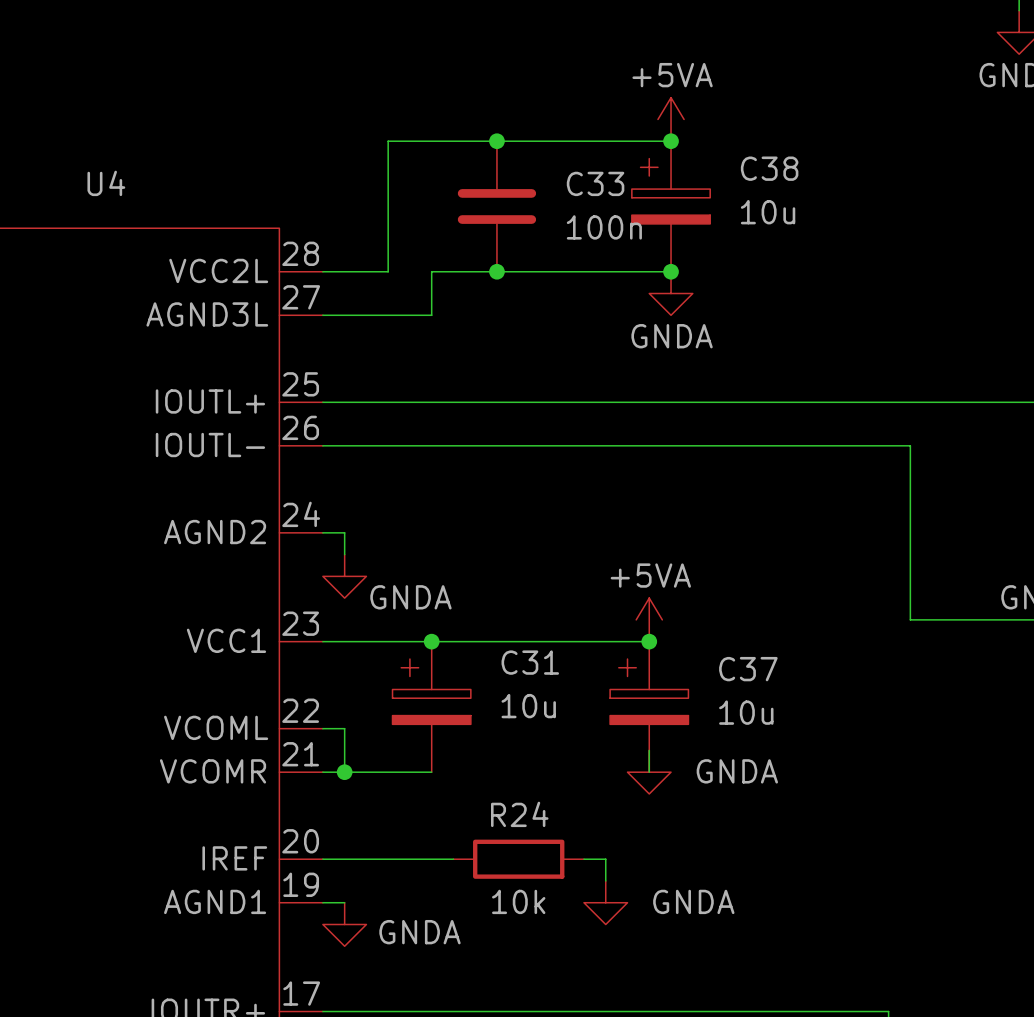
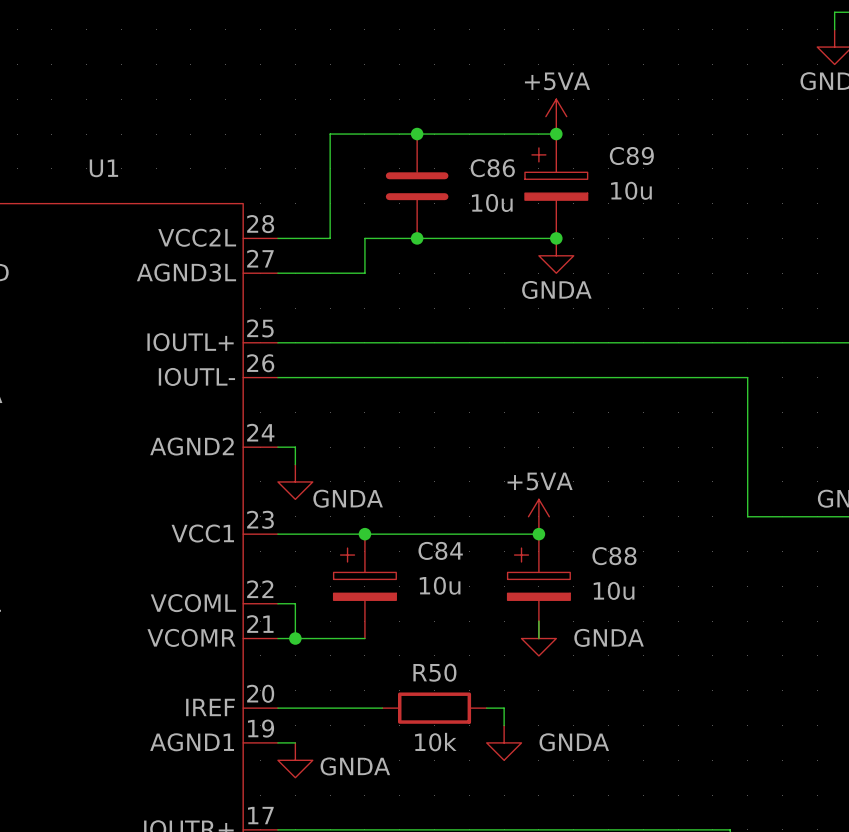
C38 name: C38 (769, 168) -> C89 (631, 156)
U4 name: U4 (106, 183) -> U1 (103, 168)
C33 name: C33 (595, 183) -> C86 (492, 168)
C33 value: 100n (604, 227) -> 10u (492, 202)
C31 name: C31 (530, 662) -> C84 (440, 550)
C37 name: C37 (748, 669) -> C88 (614, 556)
R24 name: R24 (519, 814) -> R50 (434, 672)

